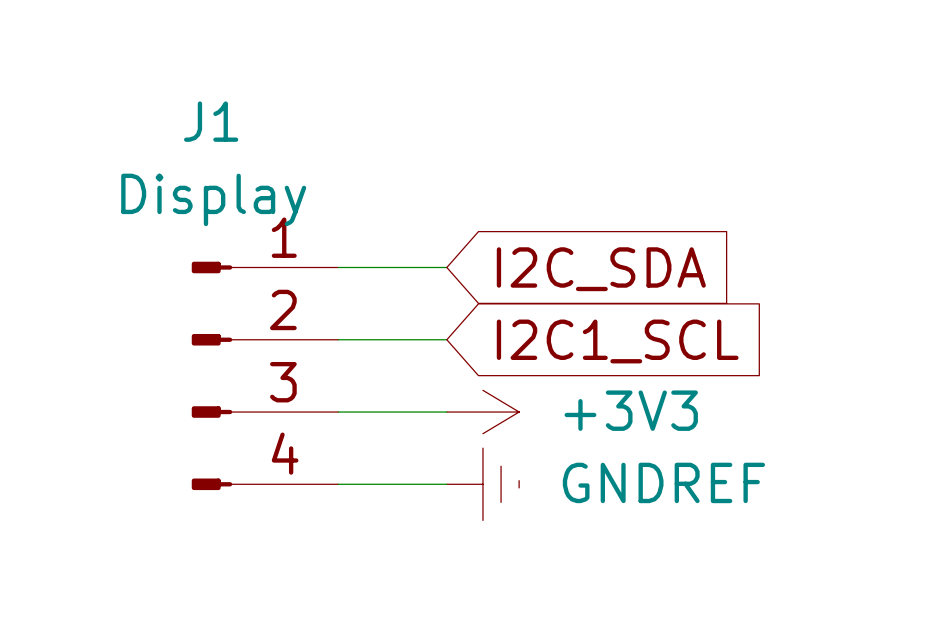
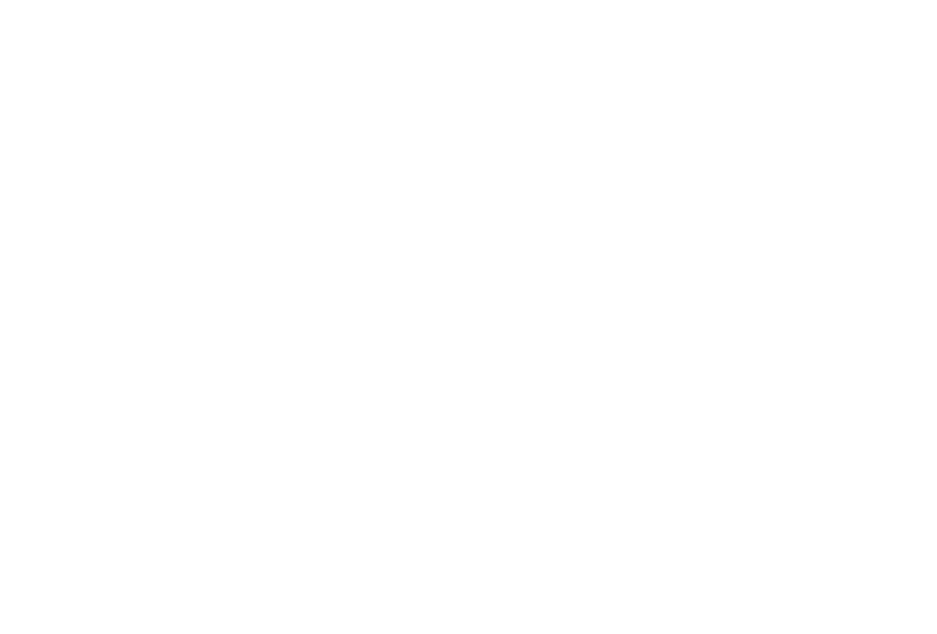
wire: (338, 267) (446, 267) -> none
global label: I2C_SDA (601, 269) -> none
wire: (338, 339) (446, 339) -> none
global label: I2C1_SCL (617, 341) -> none
J1: Display (265, 375) -> none
wire: (338, 412) (446, 412) -> none
power symbol: +3V3 (482, 412) -> none
wire: (338, 484) (446, 484) -> none
power symbol: GNDREF (482, 484) -> none

